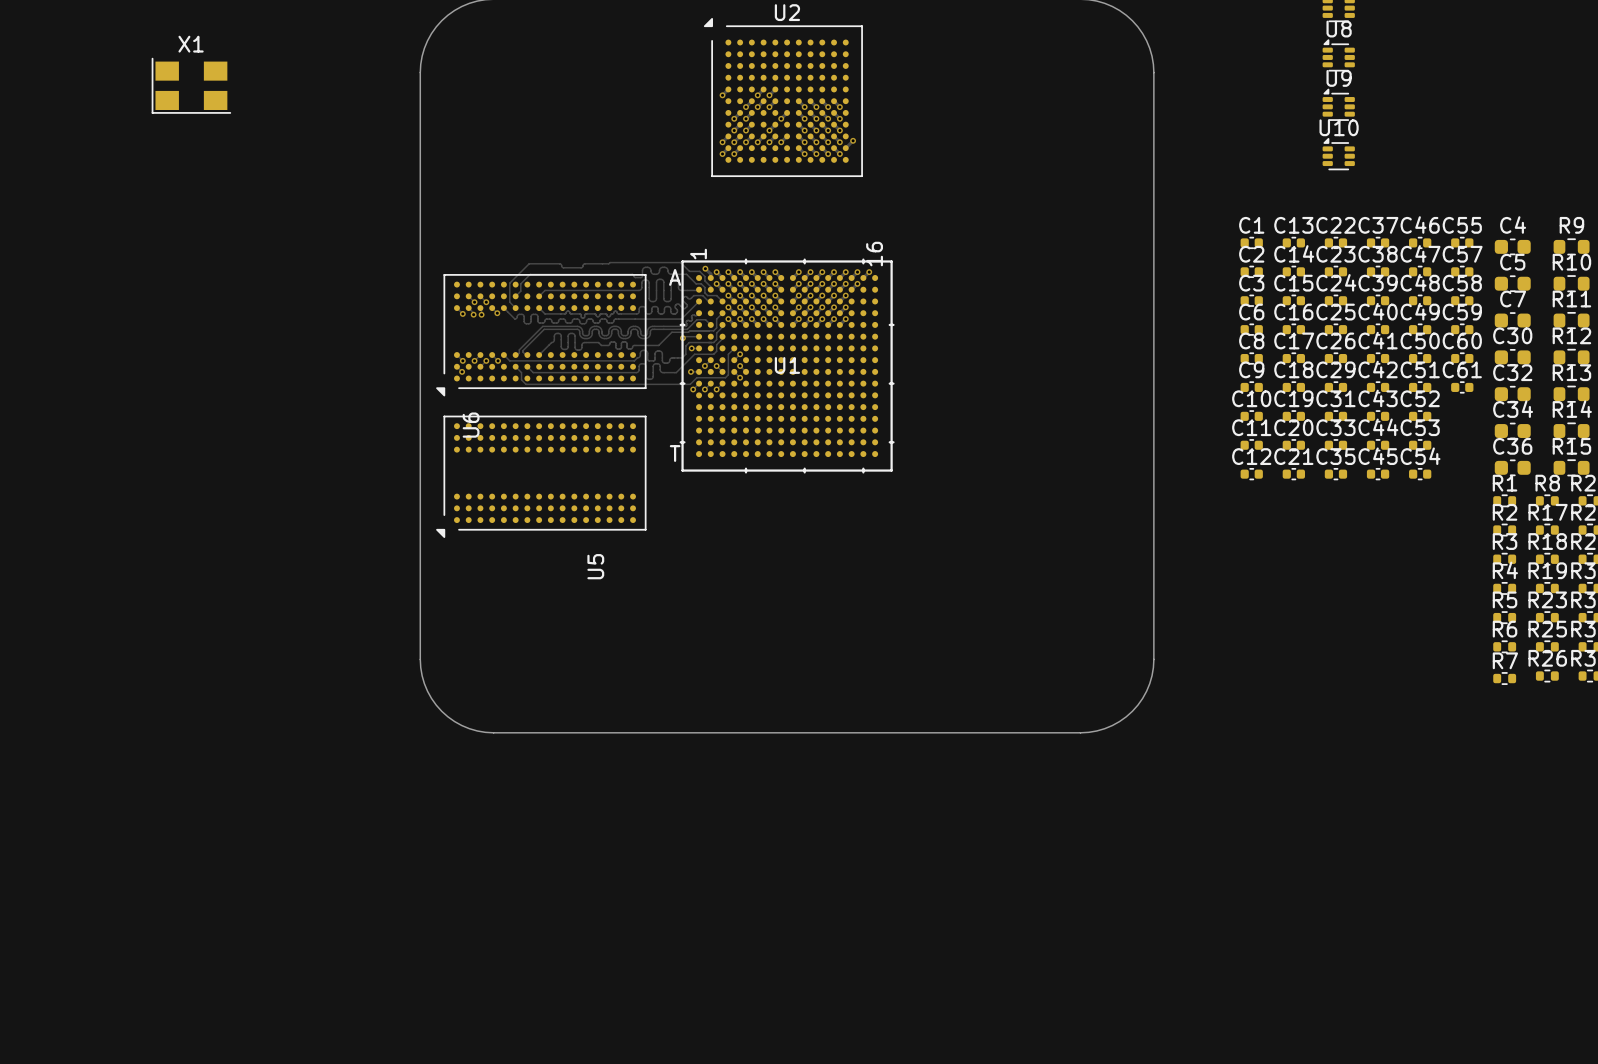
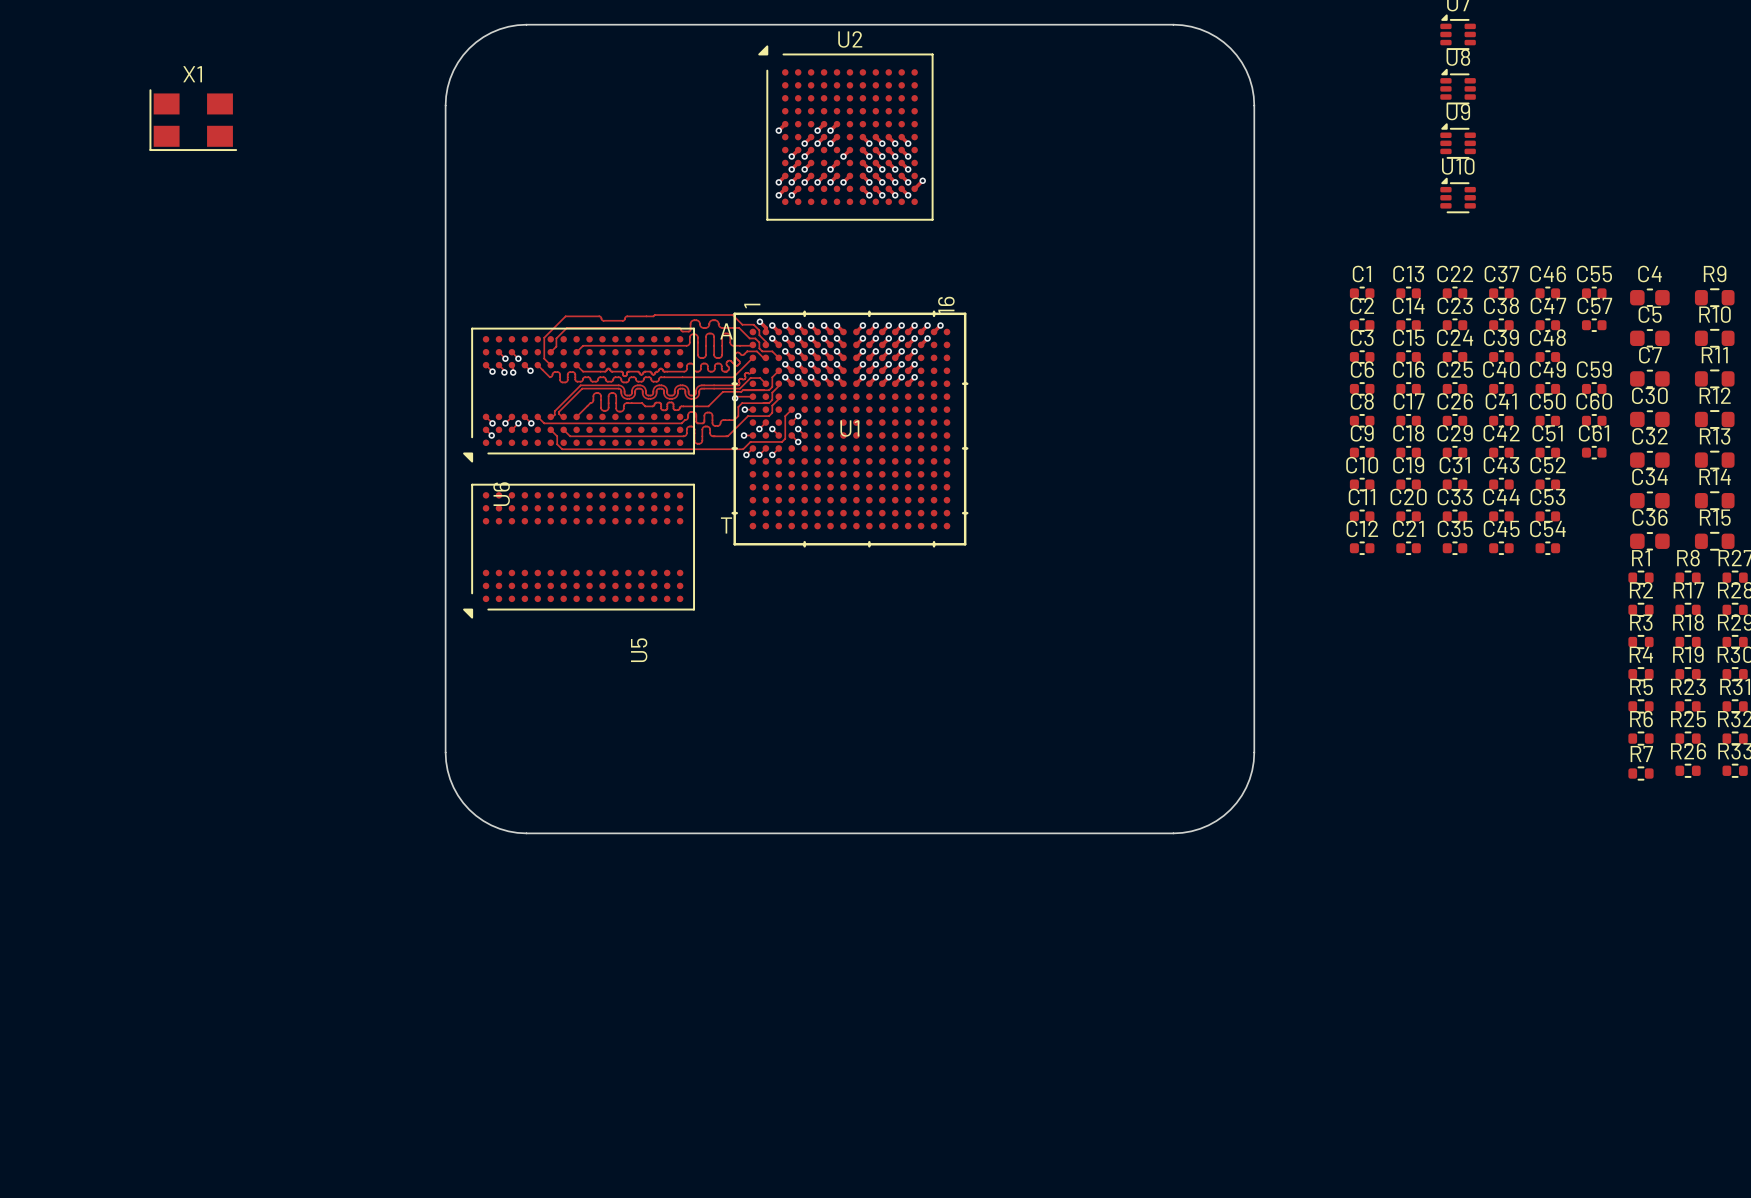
C58: (1462, 300) -> none

